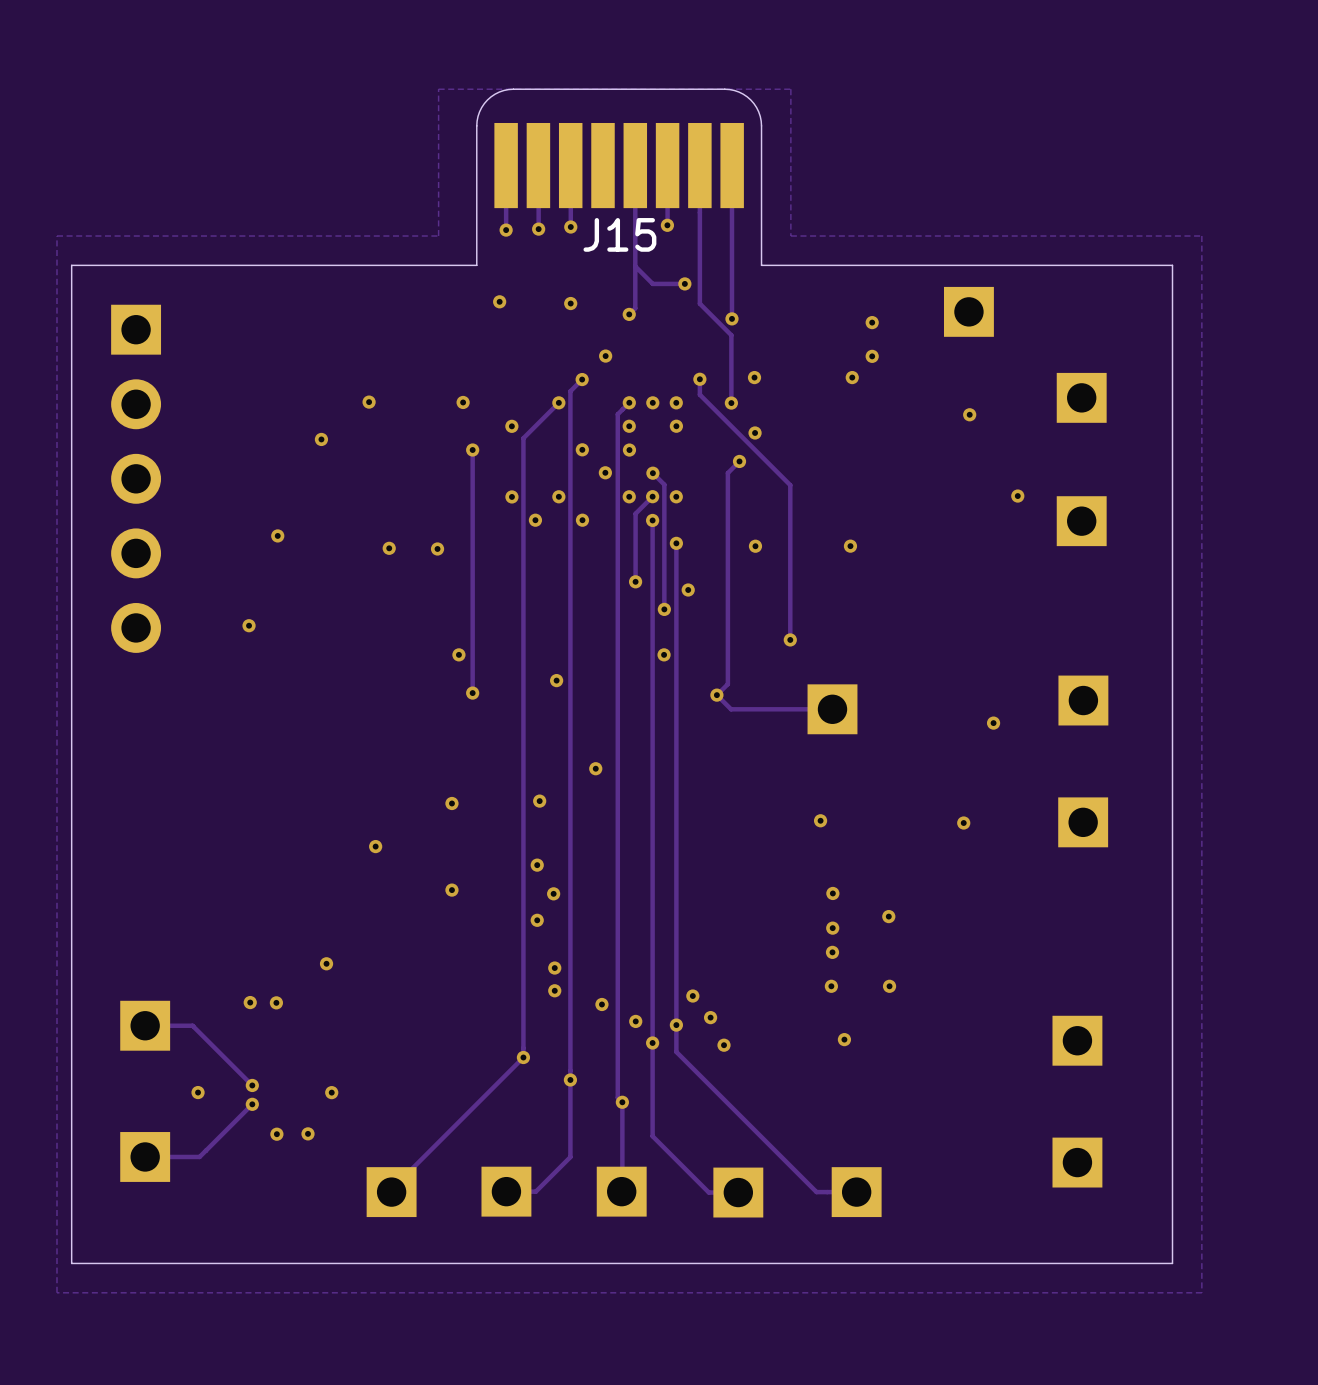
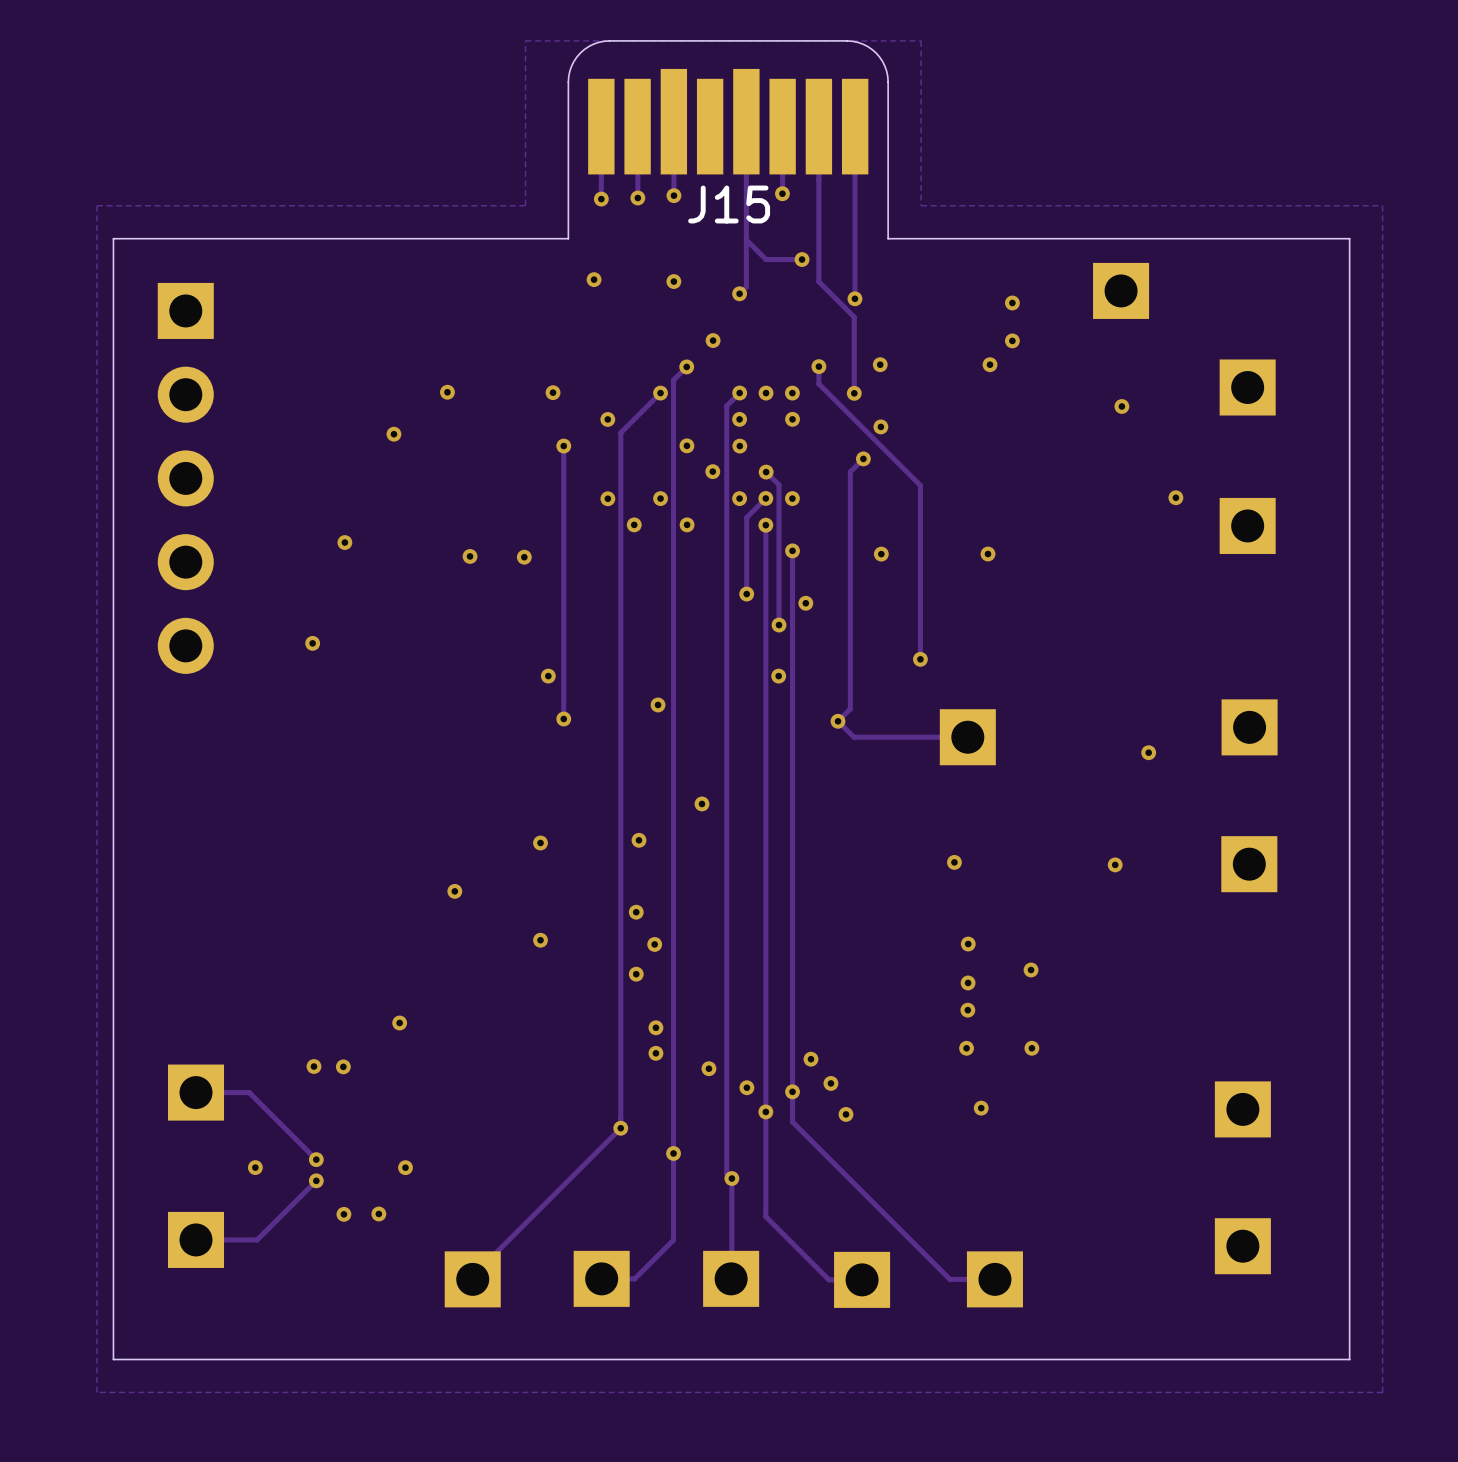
J15 footprint: [494, 122, 744, 209] -> [588, 68, 869, 175]

